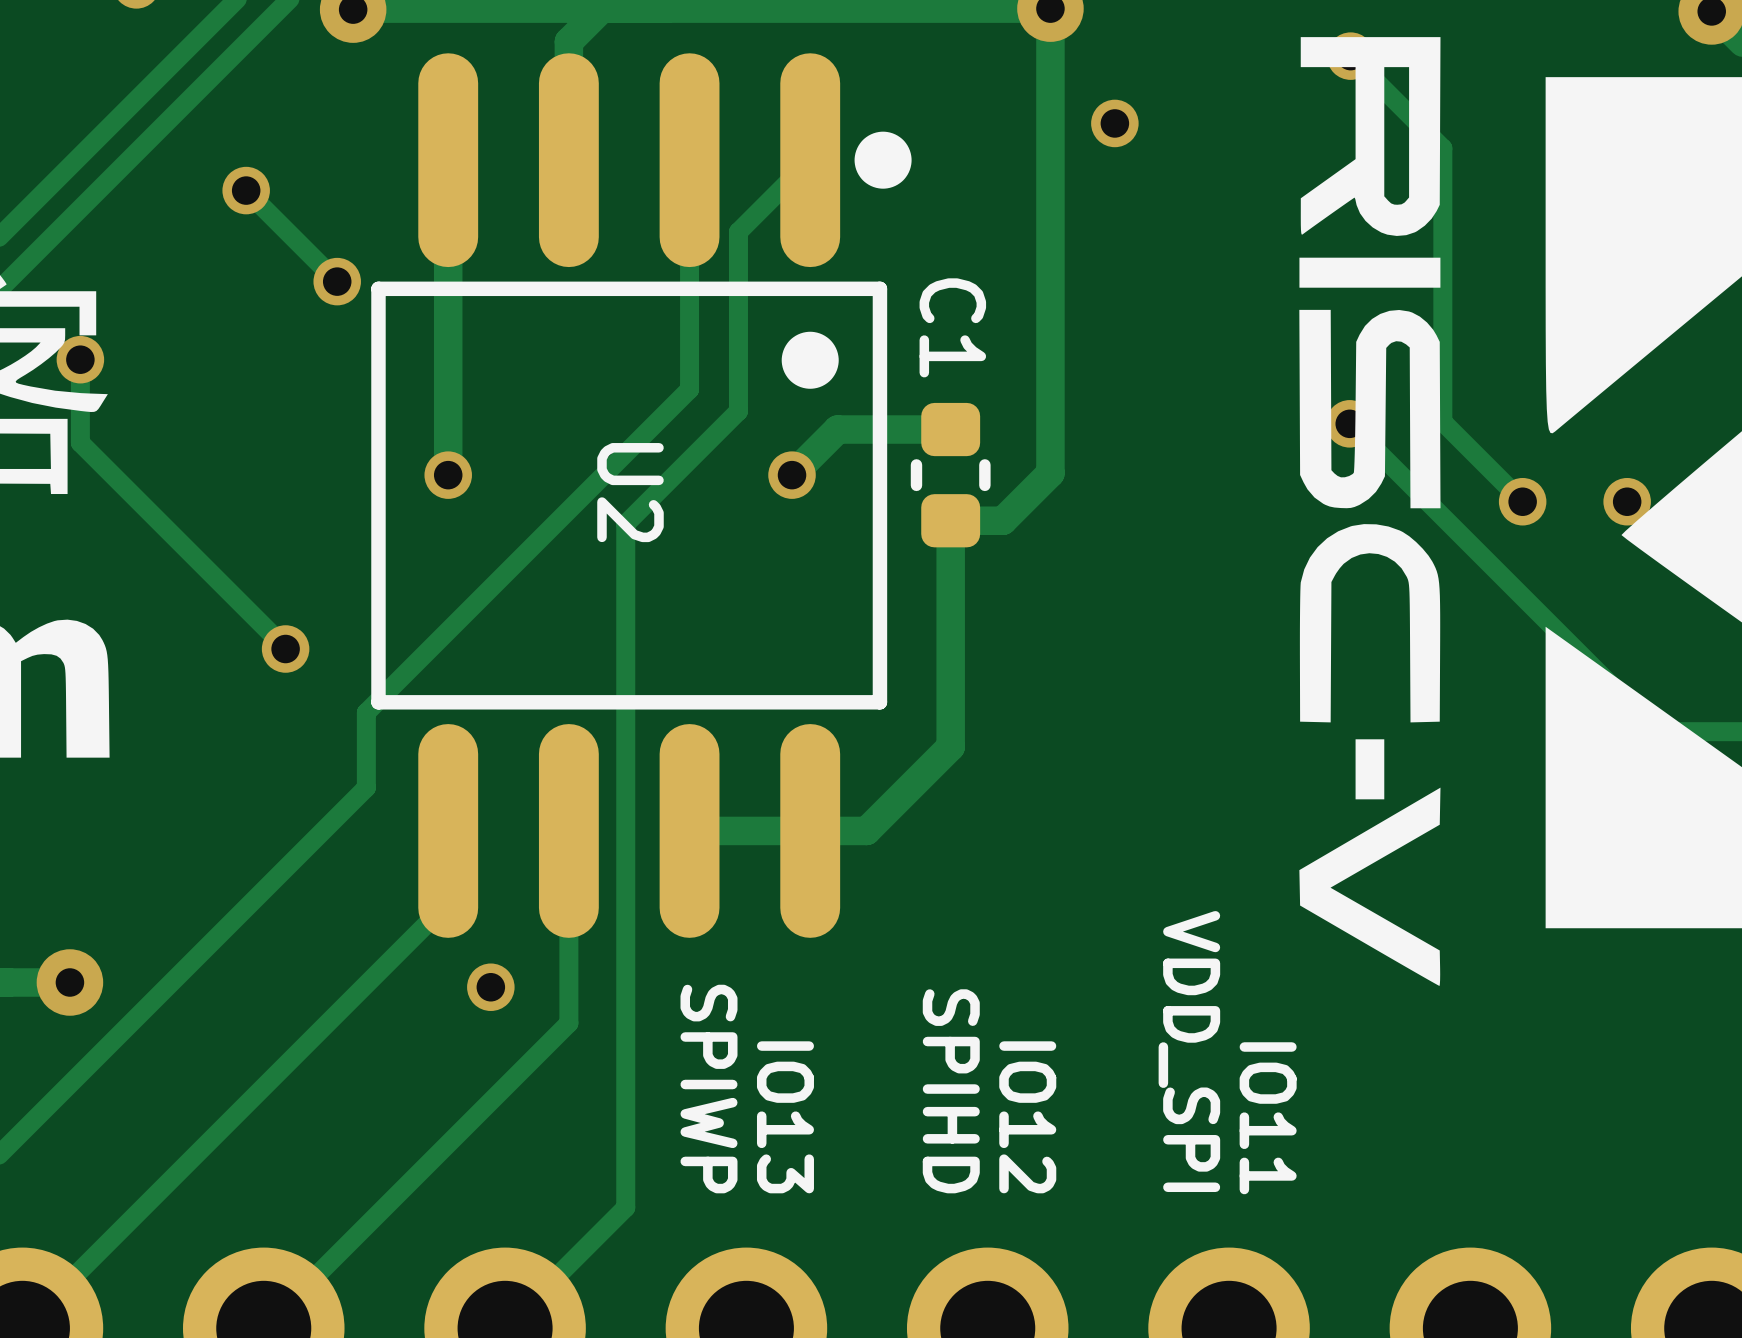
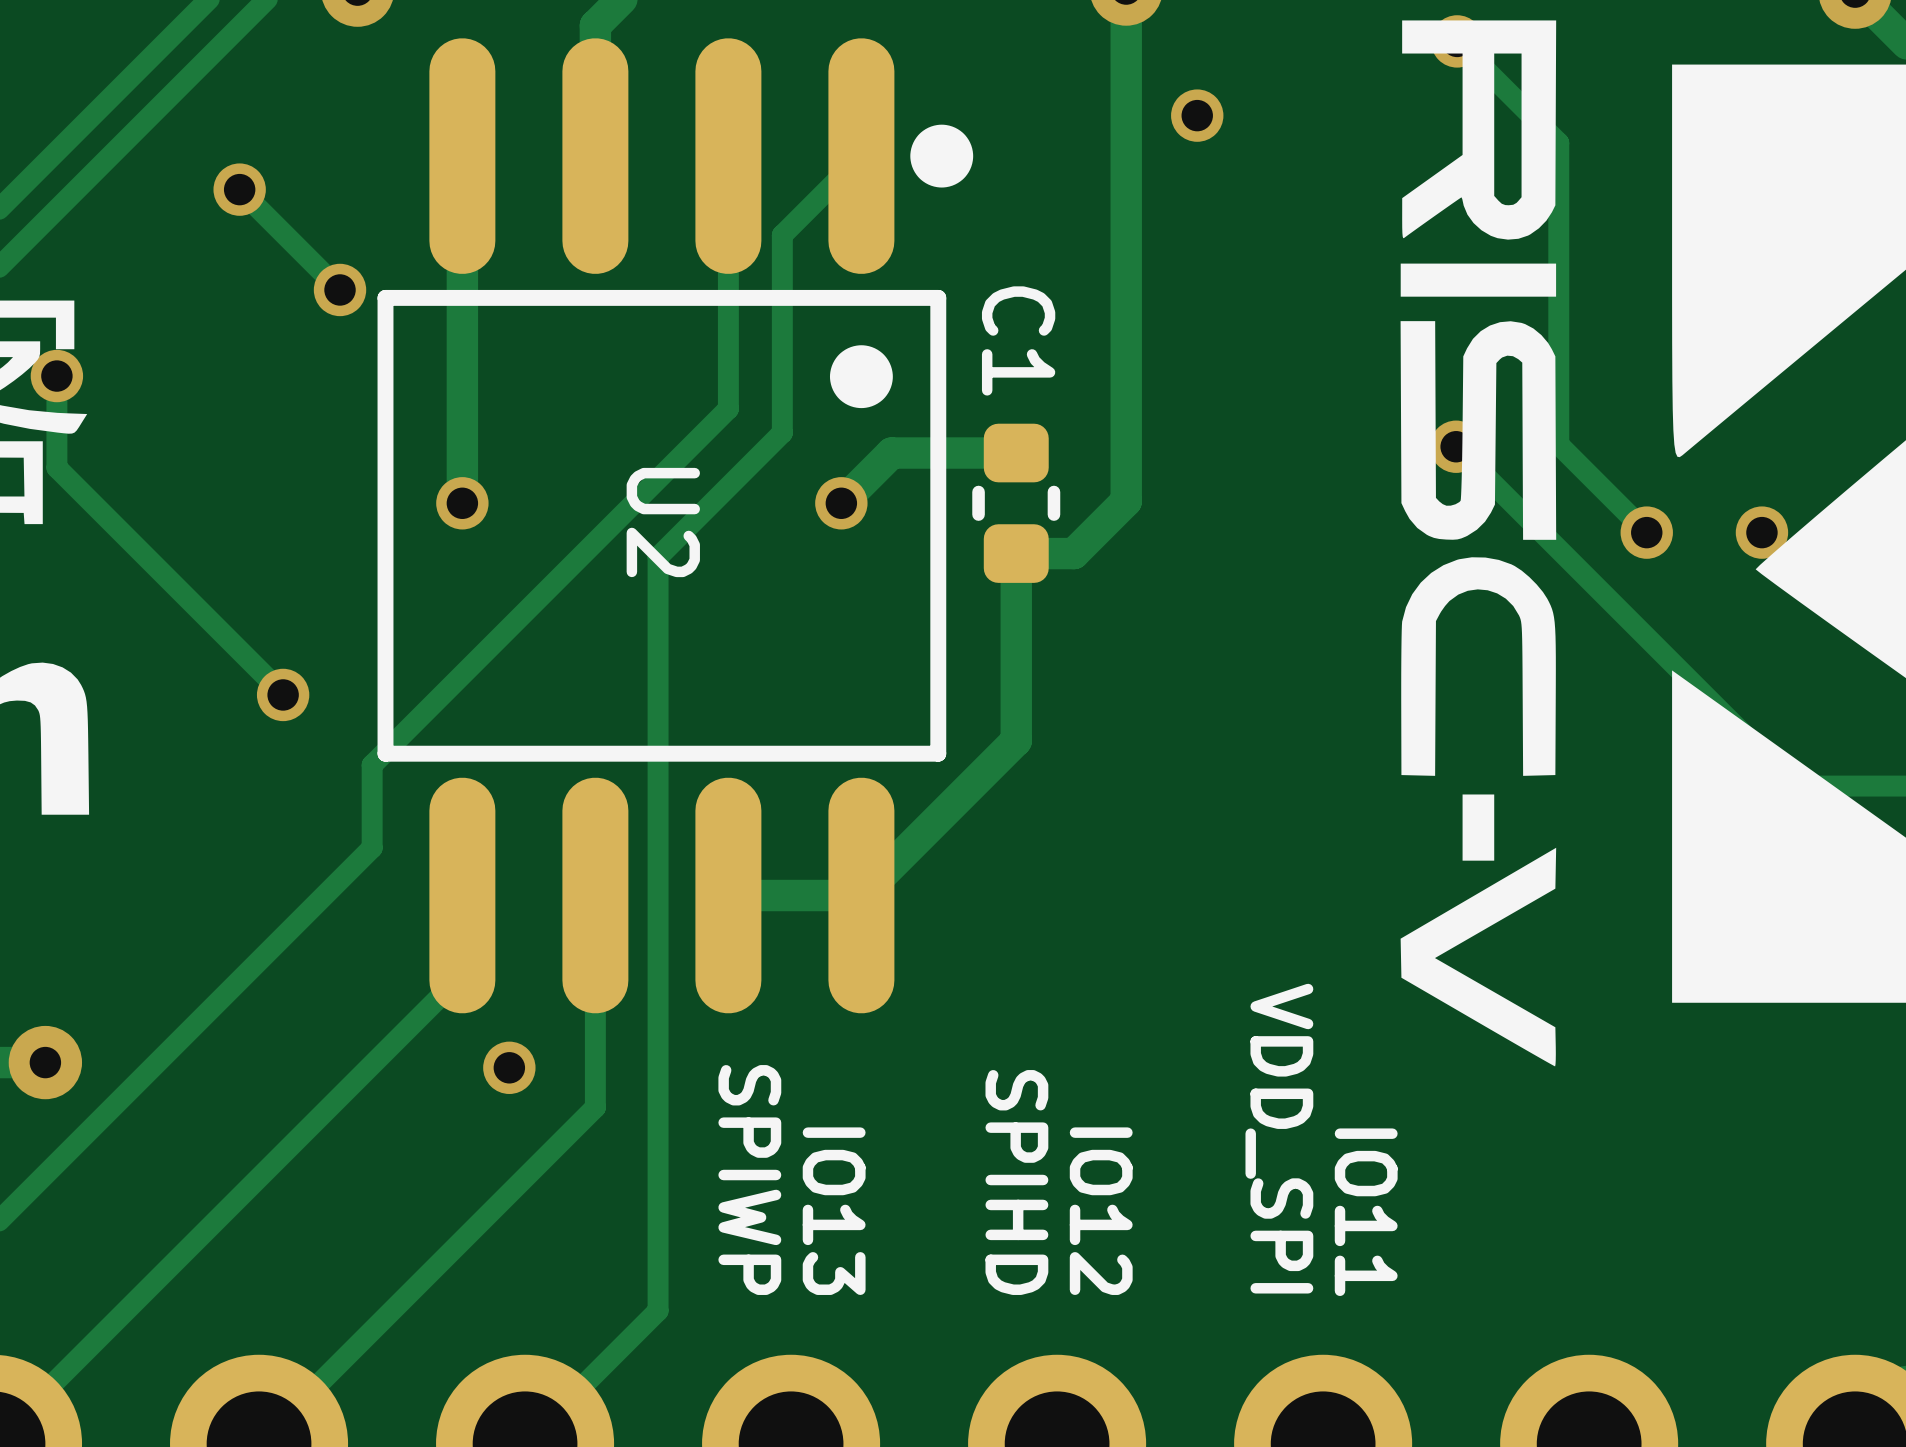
track: (950, 690) (950, 746) (866, 830) (810, 830) -> (1016, 740) (861, 895)

